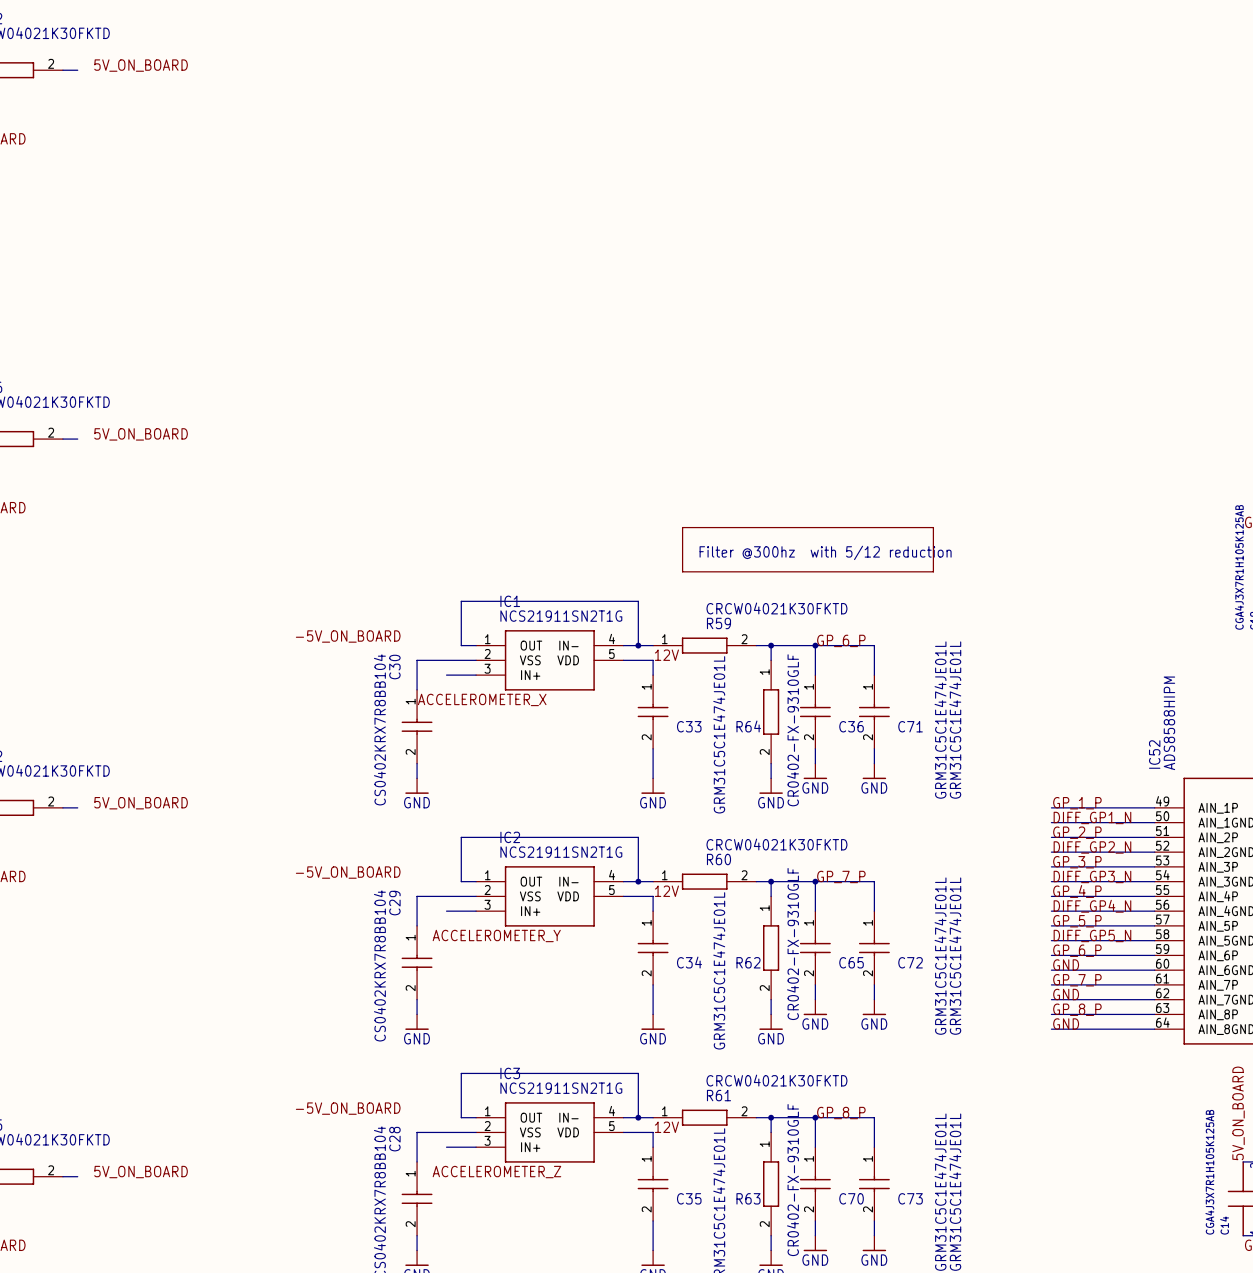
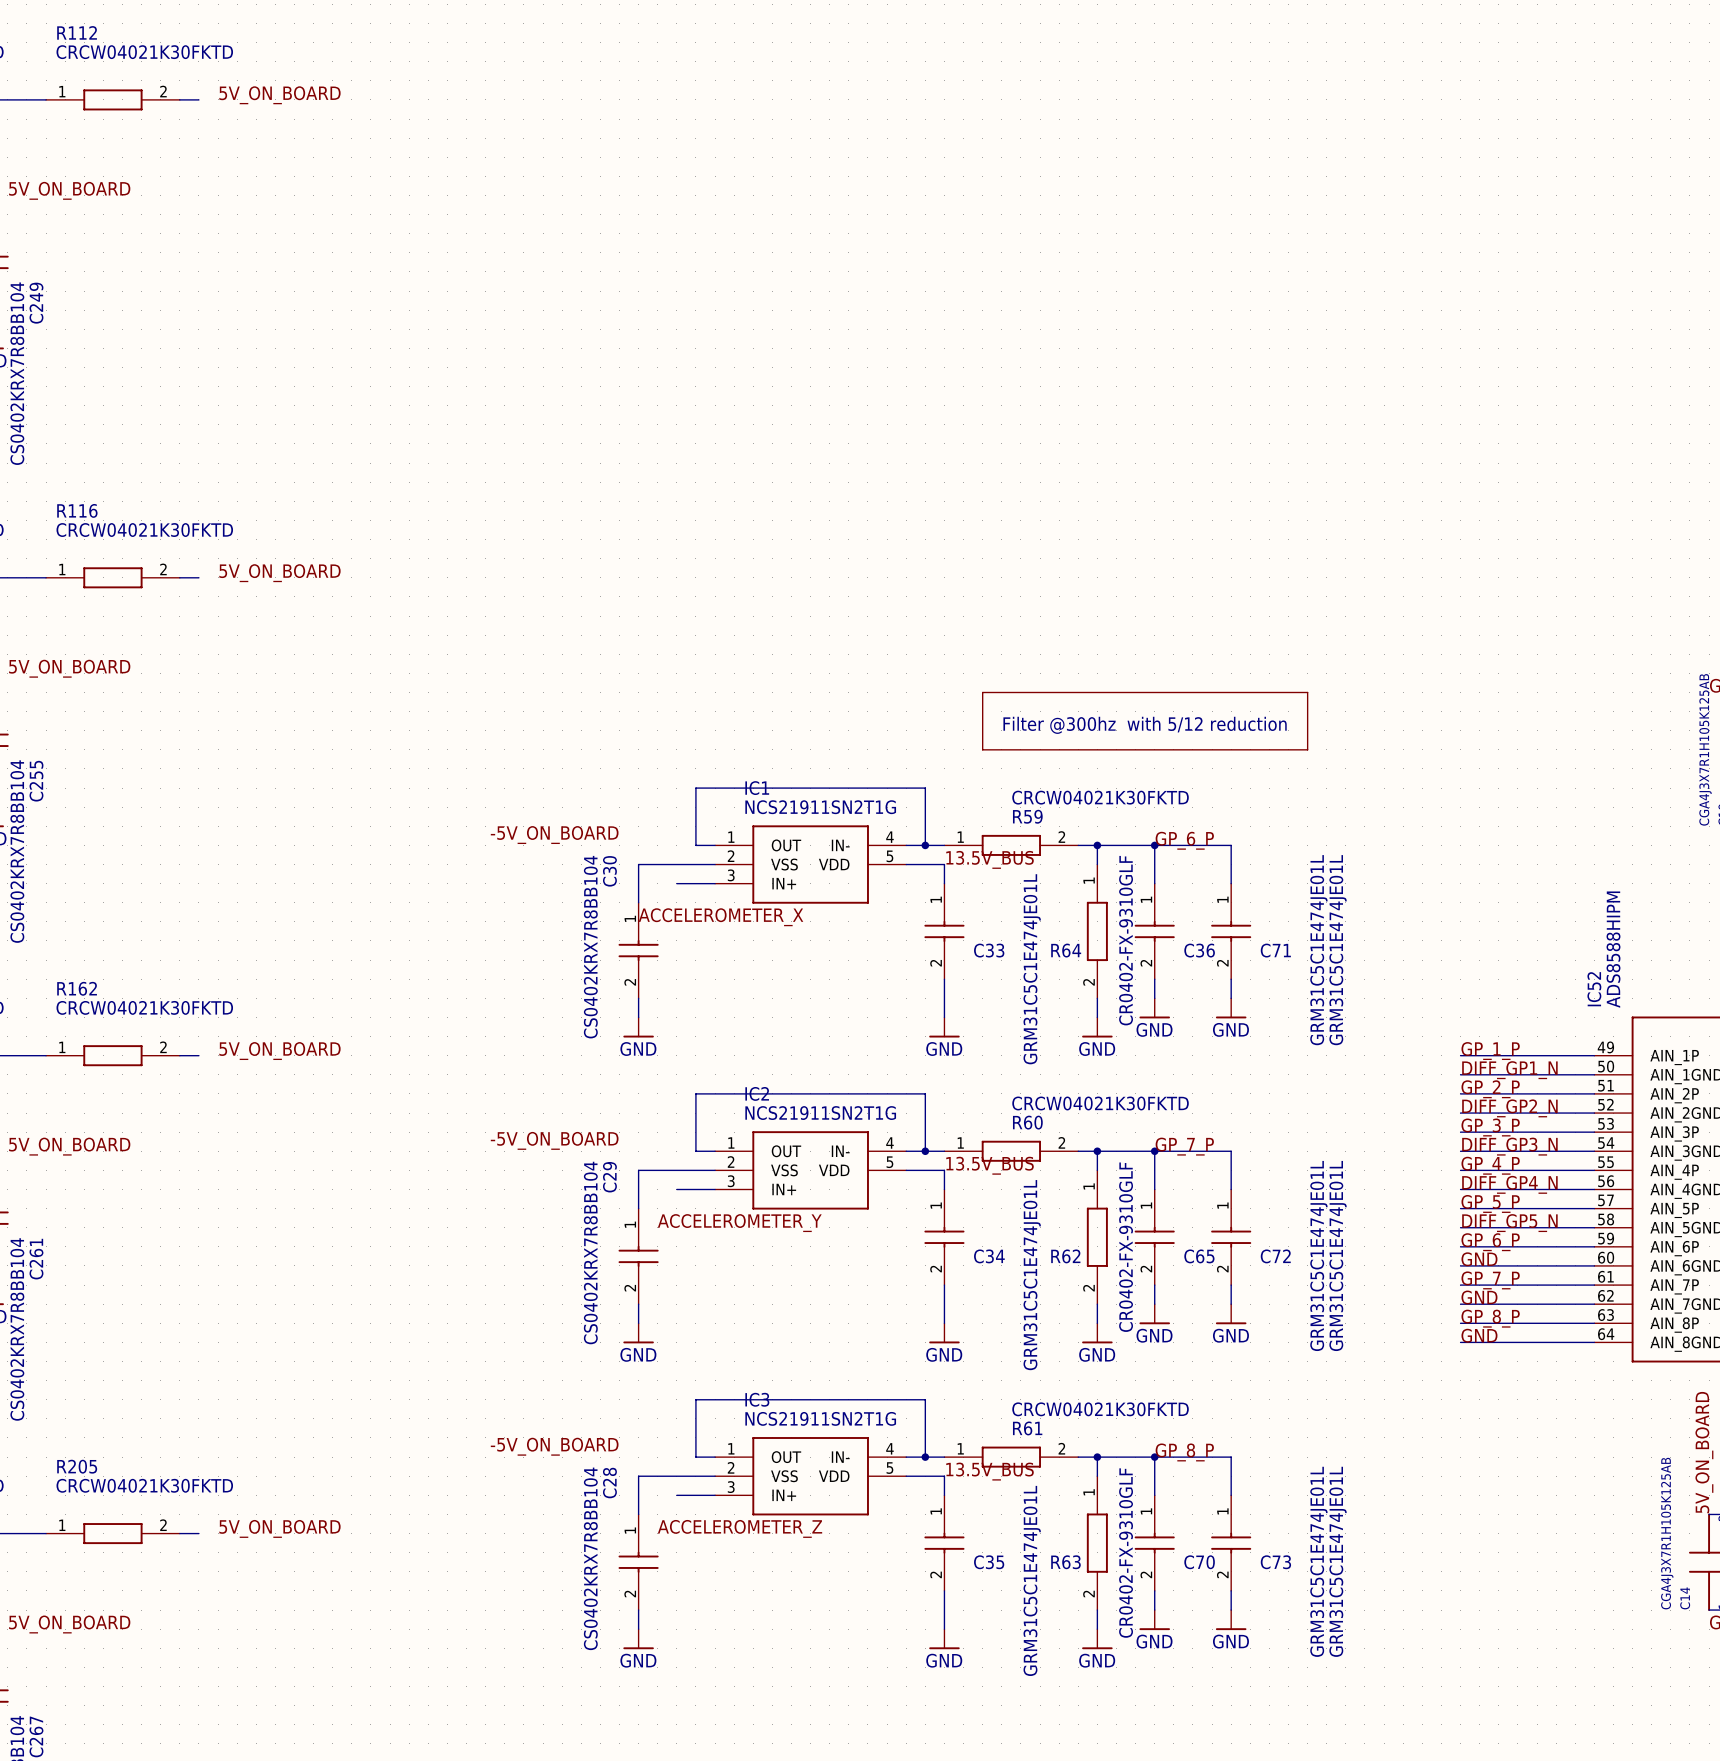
label: 12V (666, 655) -> 13.5V_BUS (990, 859)
label: 12V (666, 891) -> 13.5V_BUS (990, 1165)
label: 12V (666, 1127) -> 13.5V_BUS (990, 1471)

